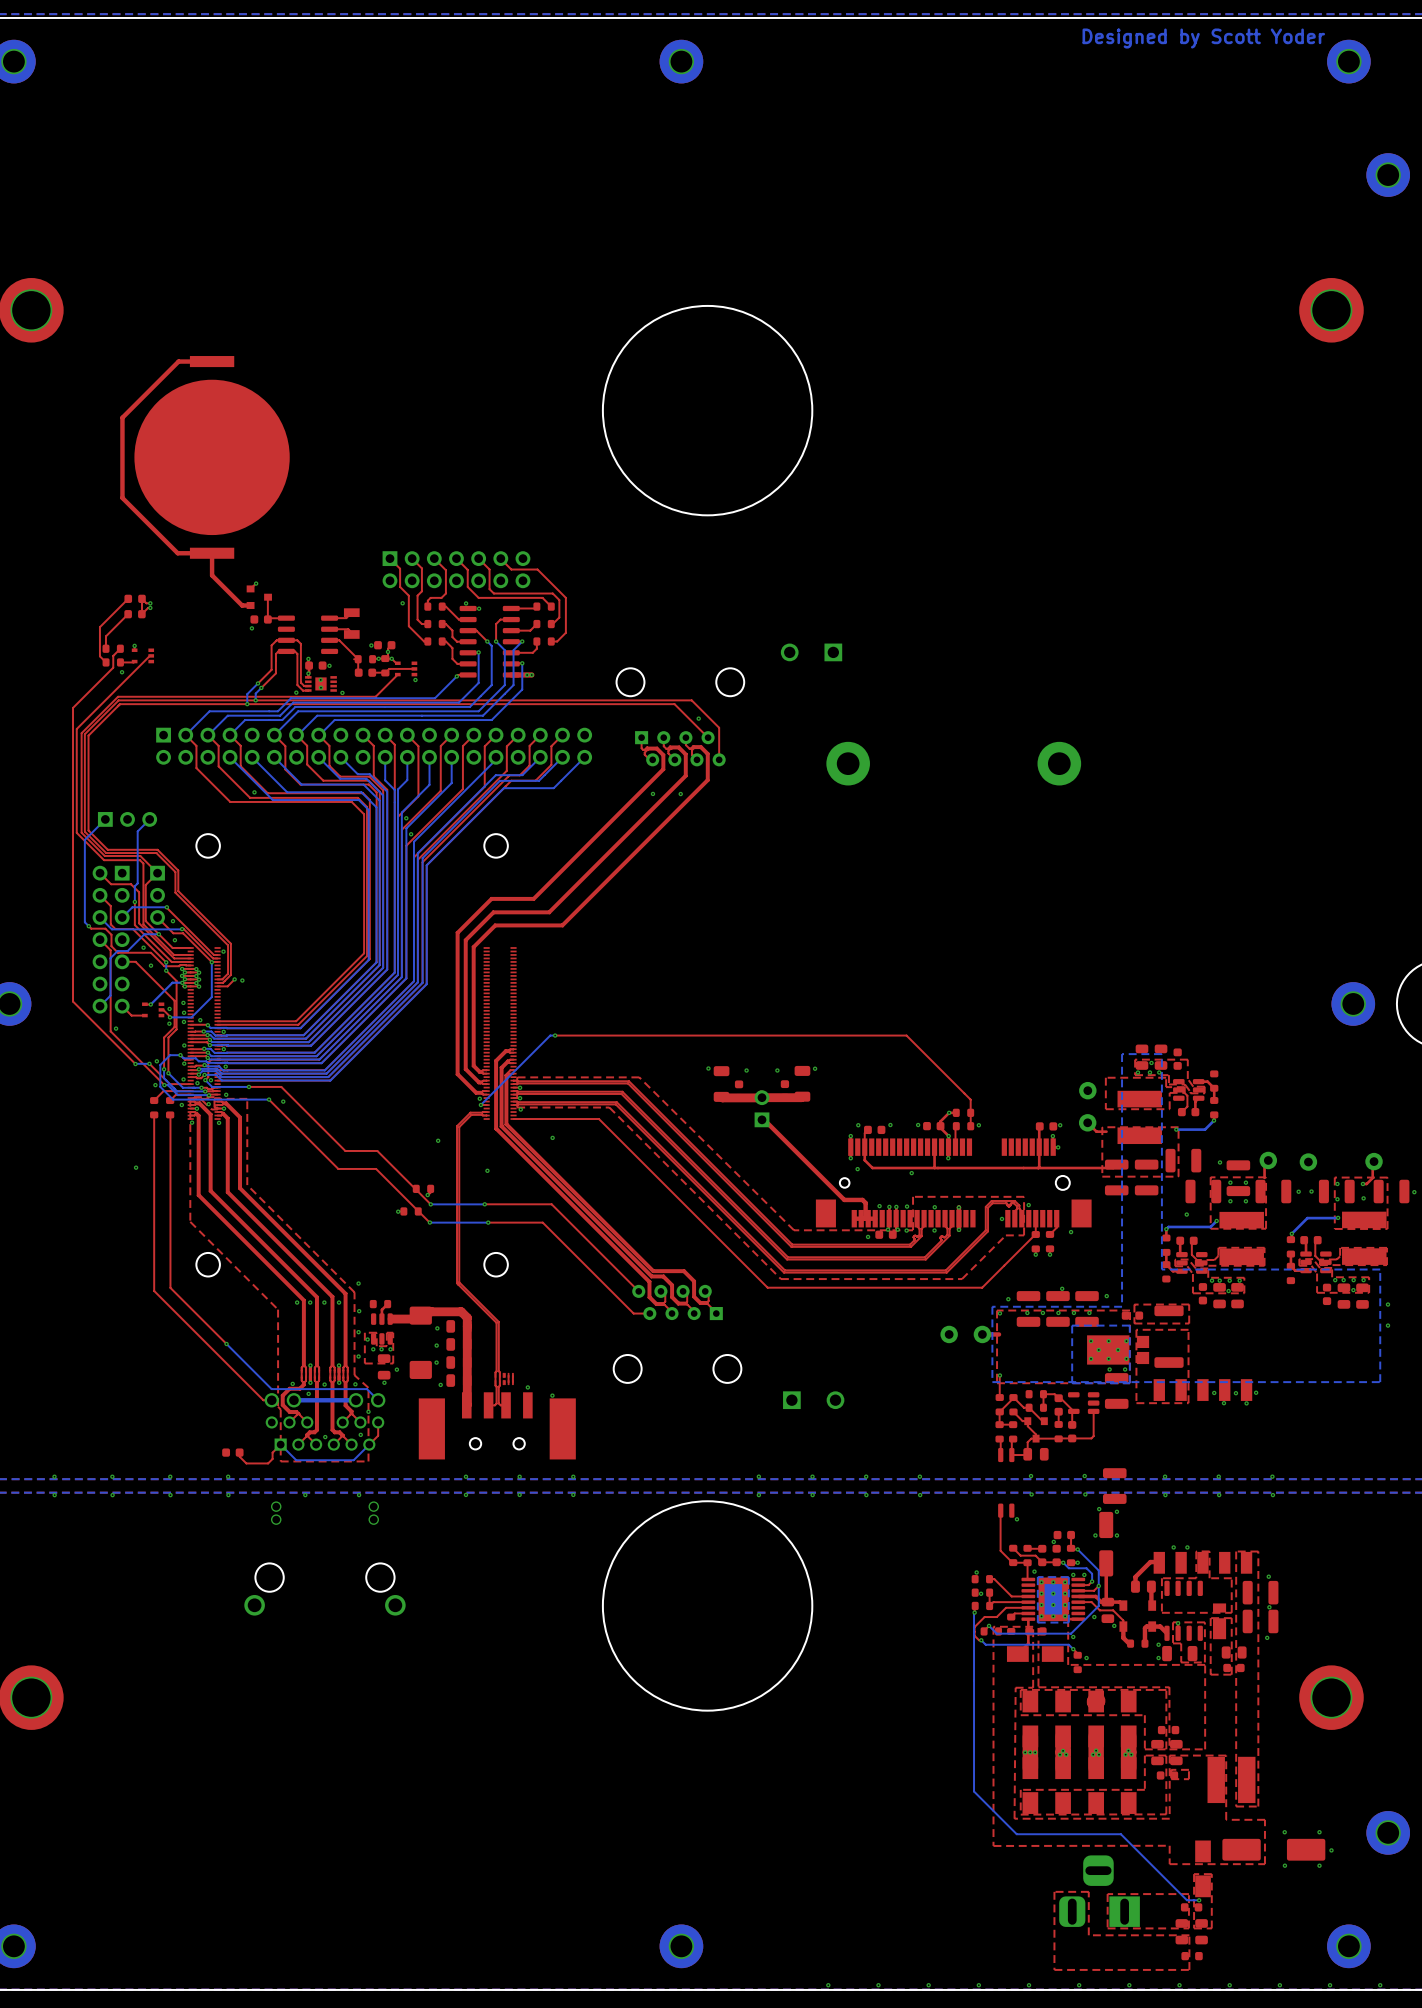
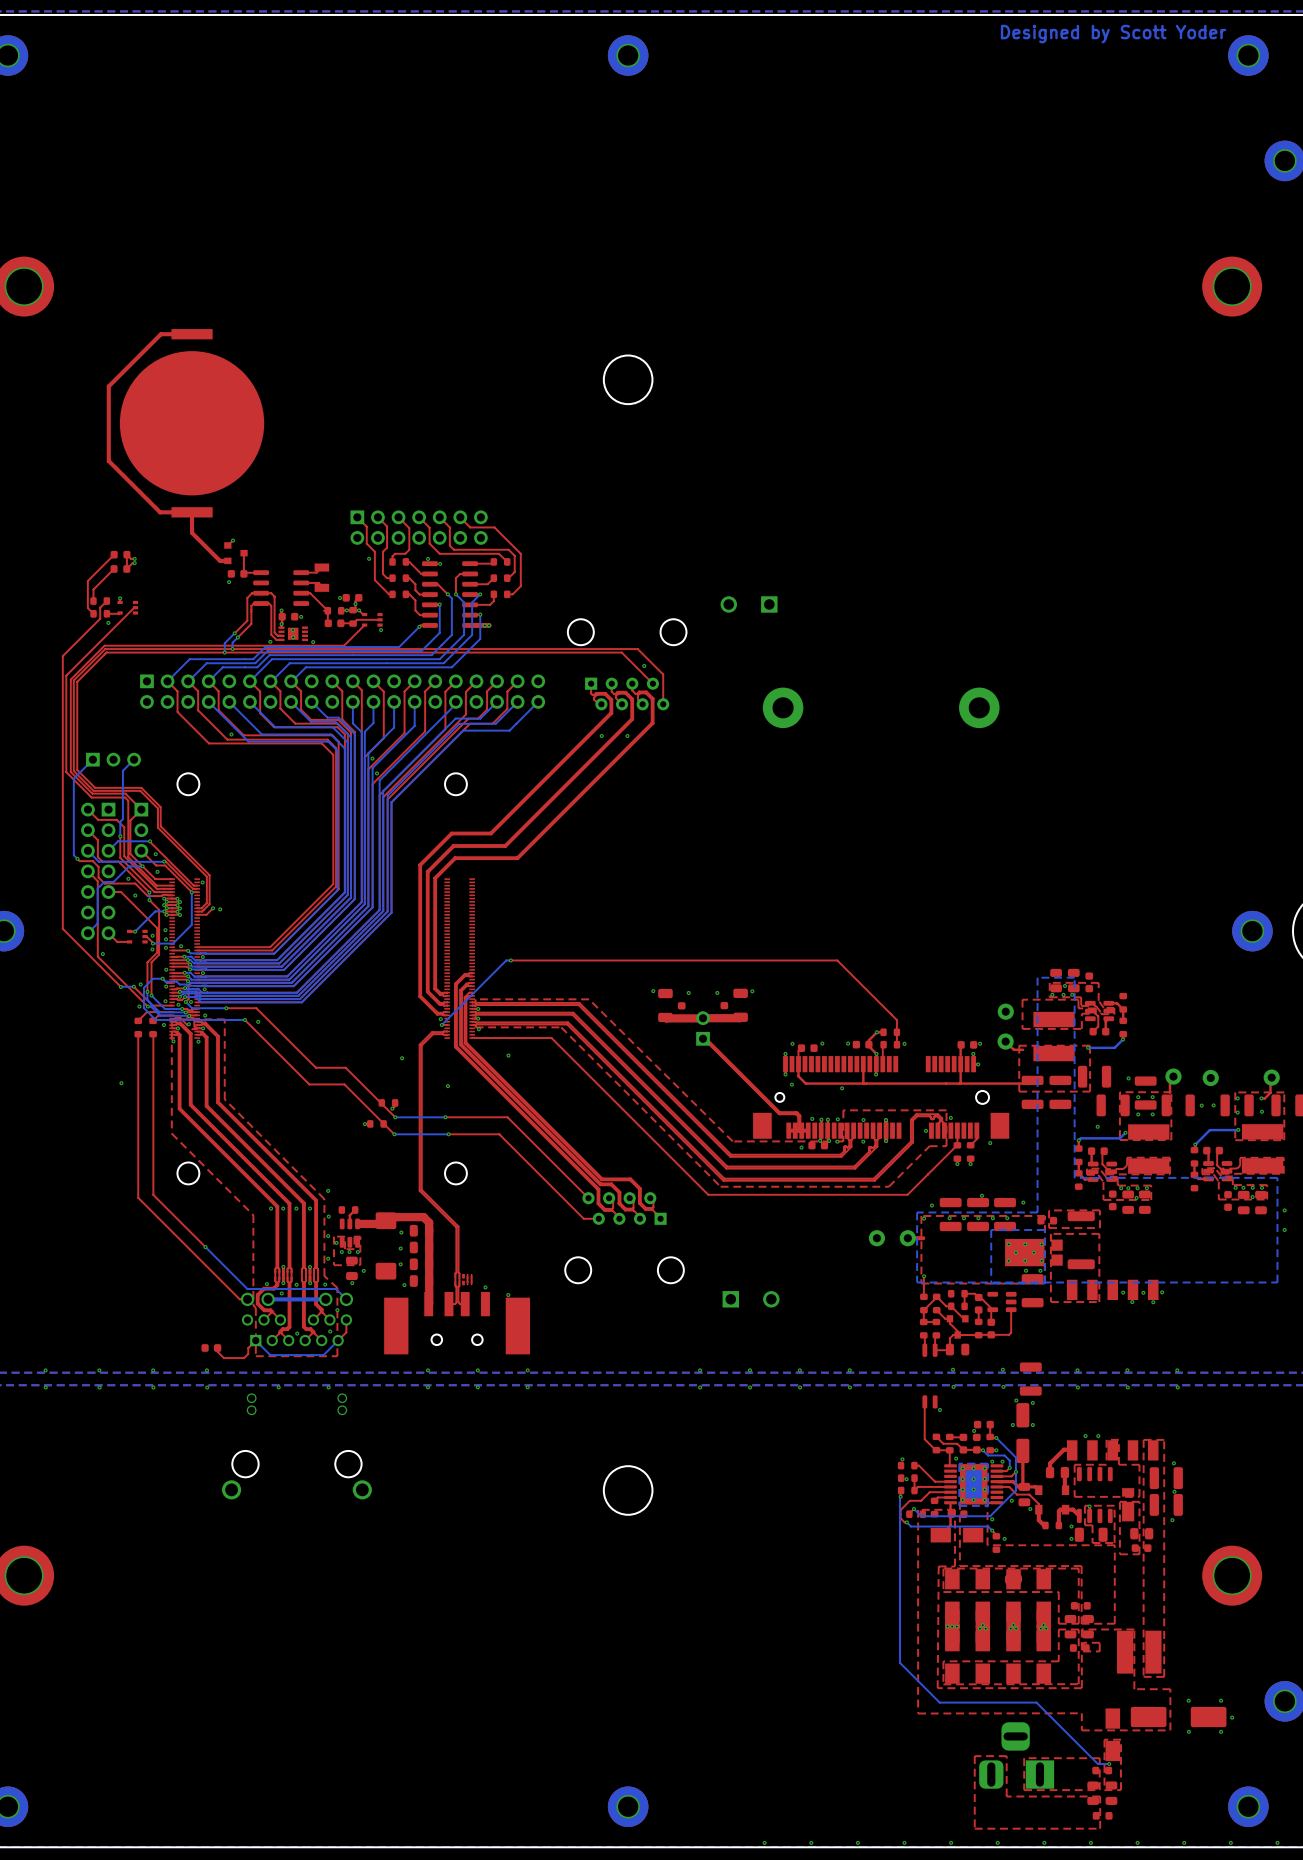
round board edge: [602, 305, 813, 516] -> none
round board edge: none -> [603, 355, 653, 405]
round board edge: [602, 1501, 813, 1711] -> none
round board edge: none -> [603, 1466, 653, 1515]

